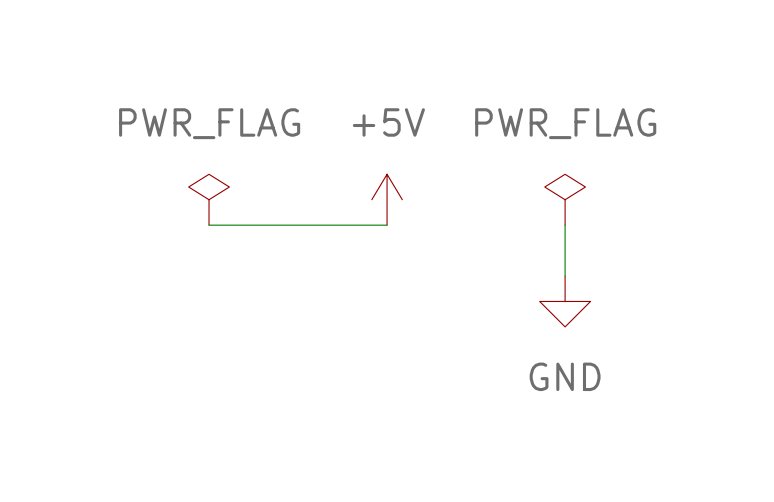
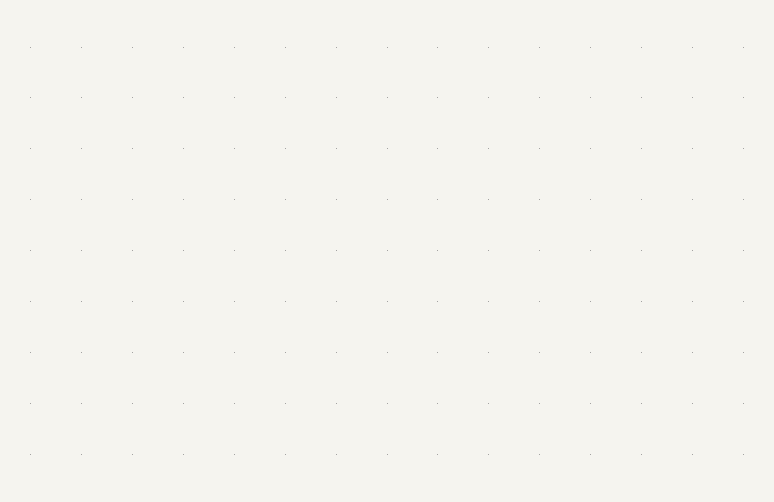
power symbol: PWR_FLAG (209, 199) -> none
power symbol: +5V (387, 199) -> none
power symbol: PWR_FLAG (565, 199) -> none
wire: (209, 225) (387, 225) -> none
wire: (565, 225) (565, 276) -> none
power symbol: GND (565, 301) -> none

